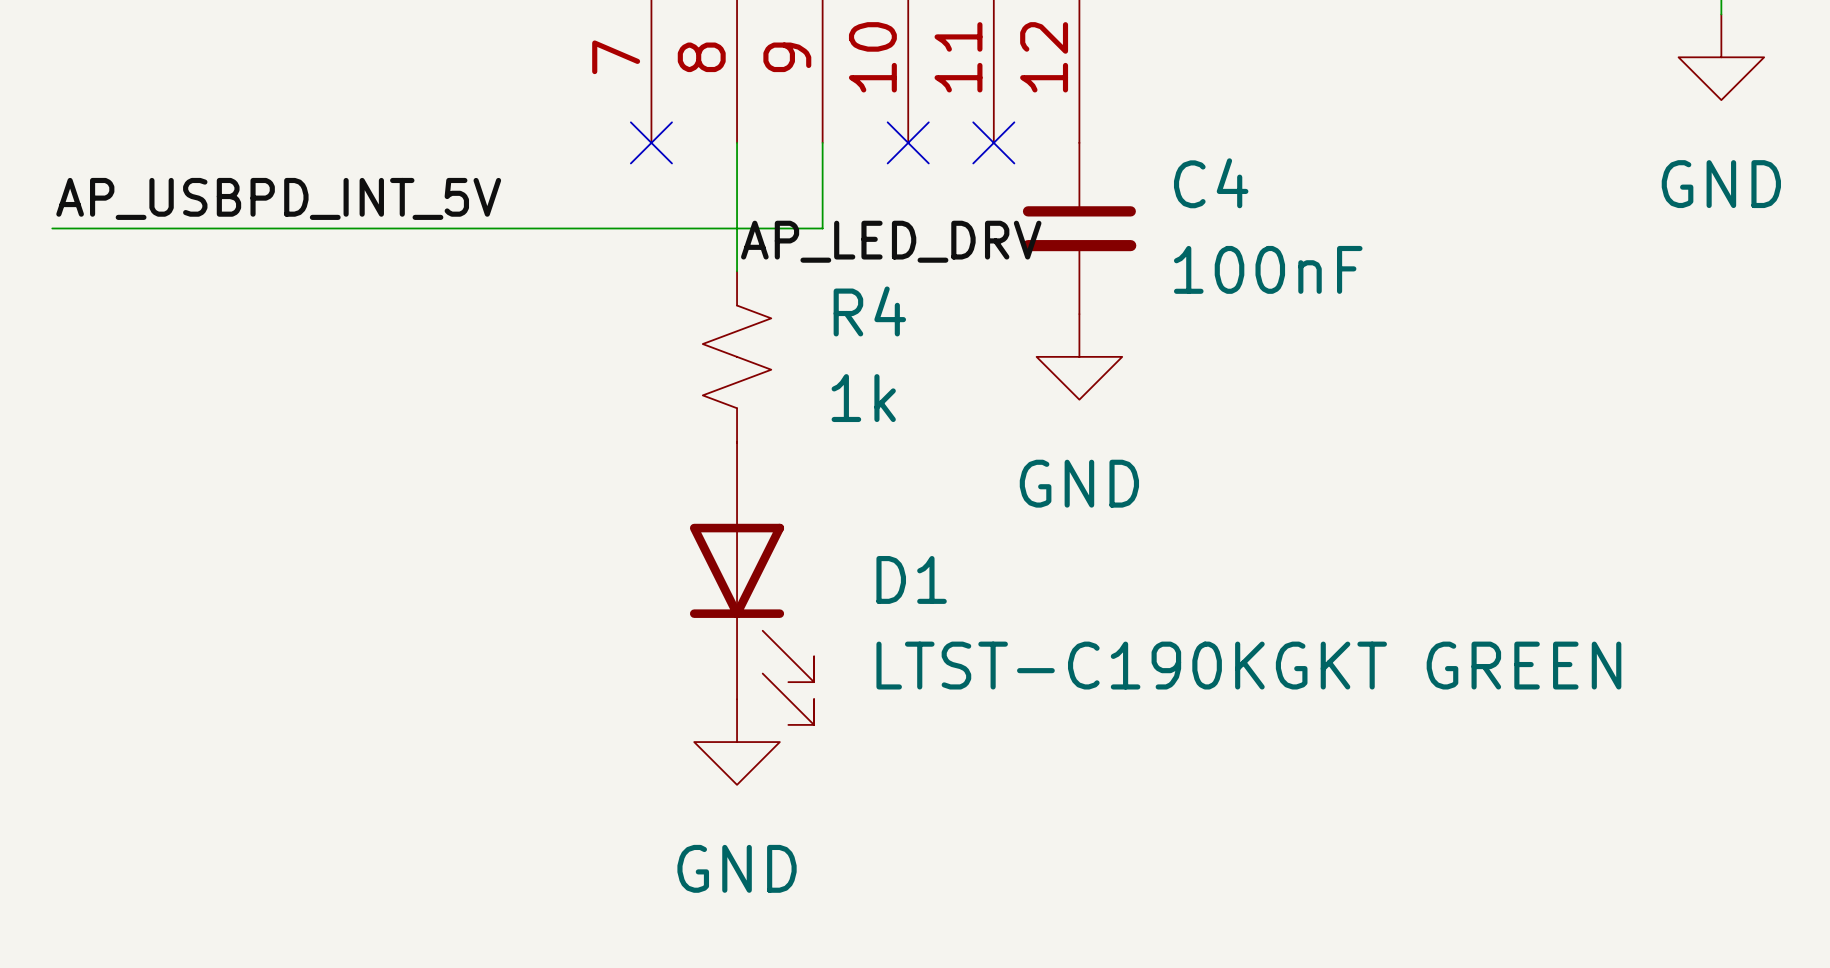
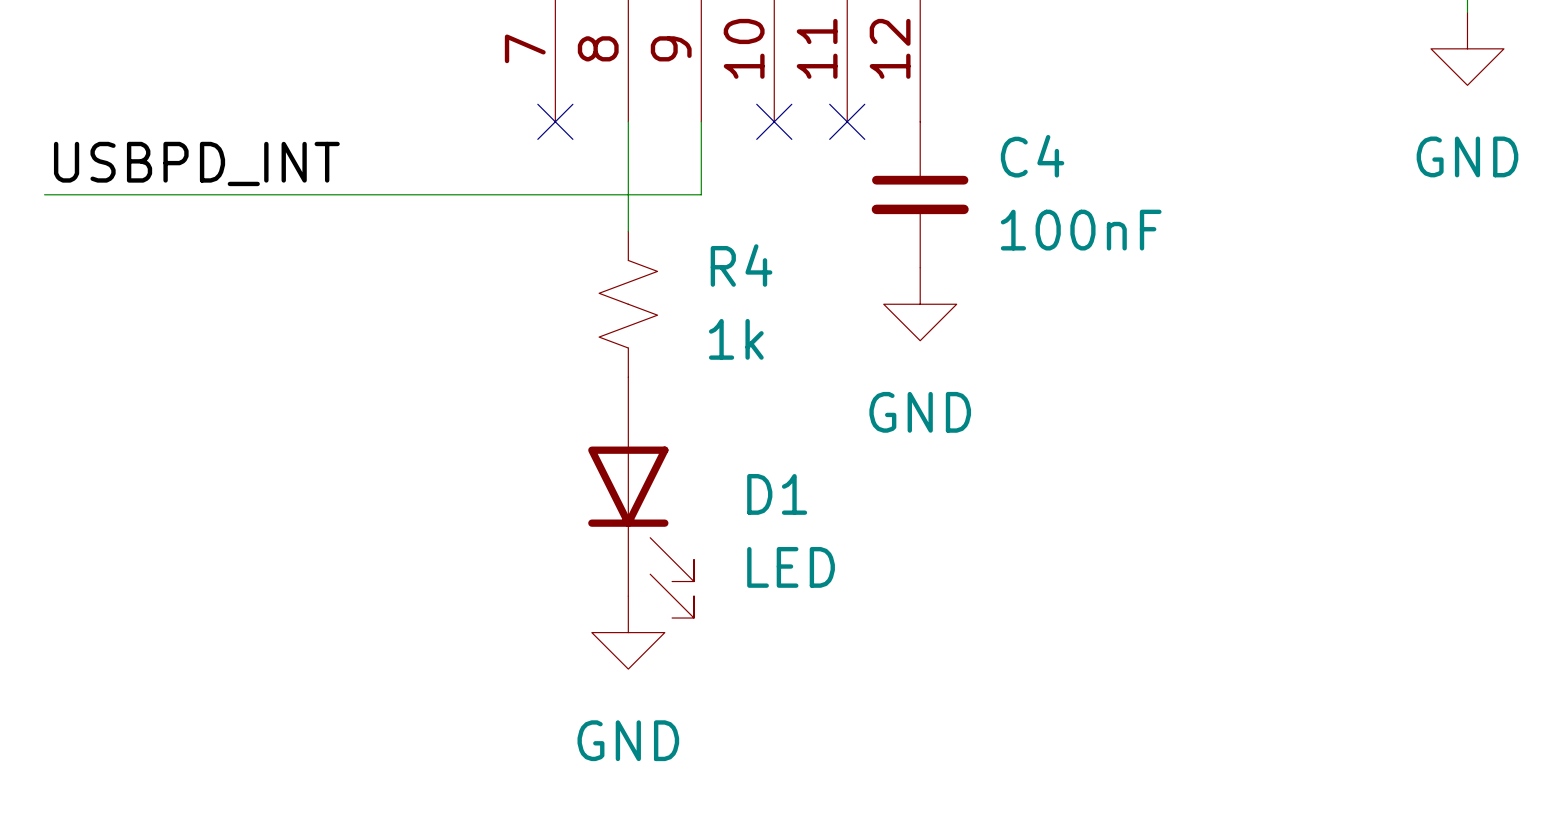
label: AP_USBPD_INT_5V (278, 198) -> USBPD_INT (196, 163)
label: AP_LED_DRV (891, 241) -> none
D1 value: LTST-C190KGKT GREEN (1248, 665) -> LED (791, 567)

